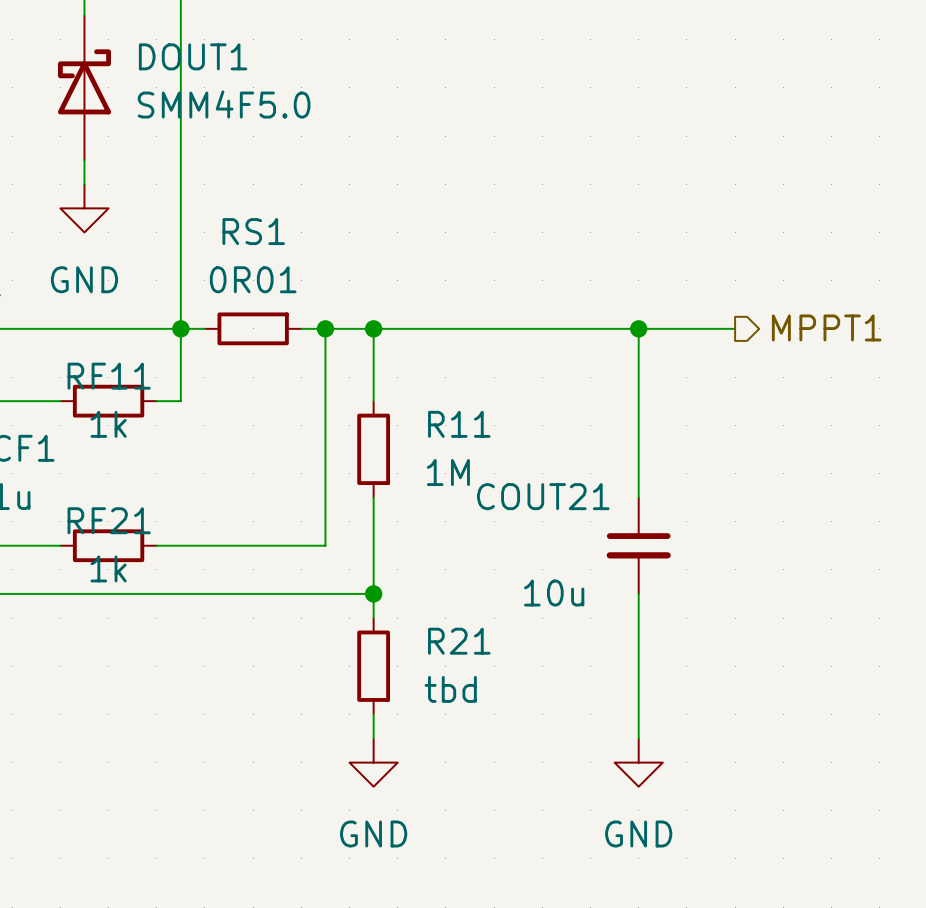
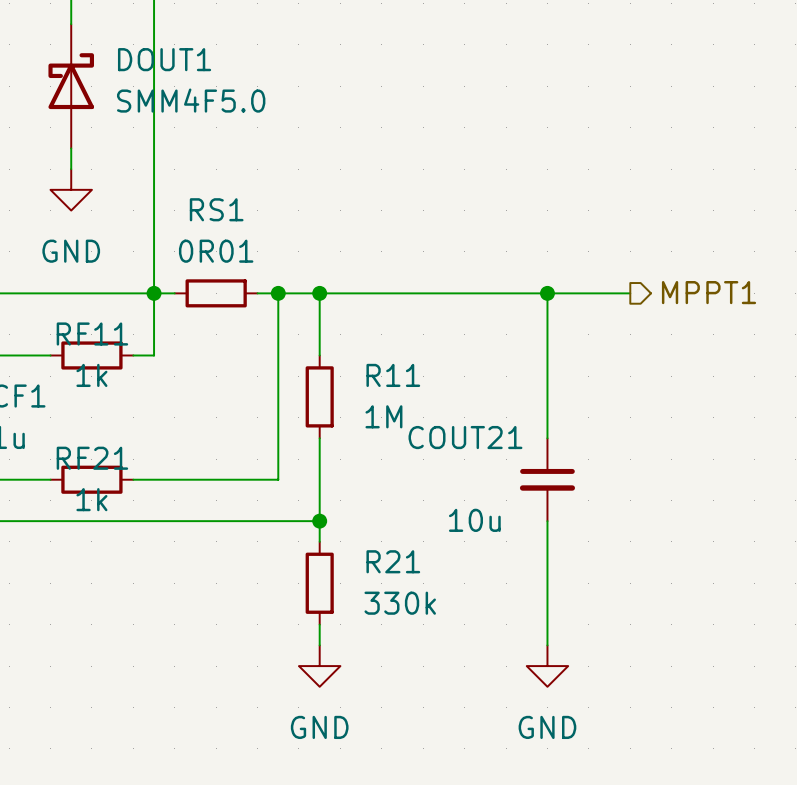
R21 value: tbd (450, 689) -> 330k (400, 603)

